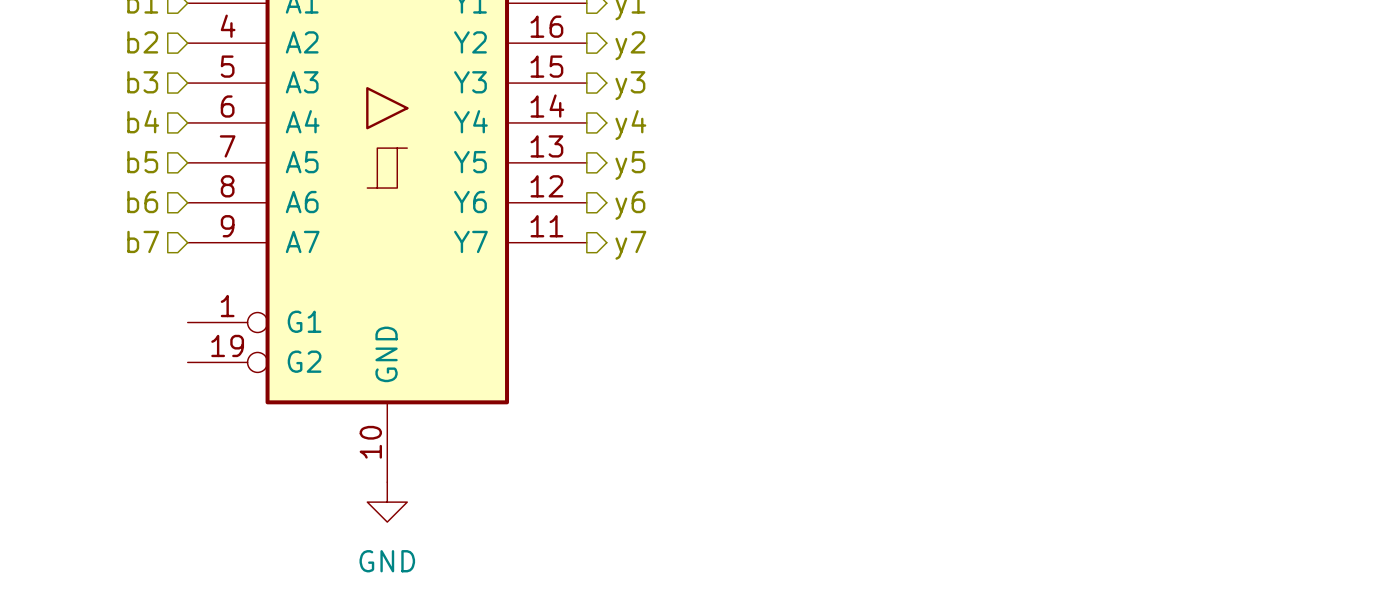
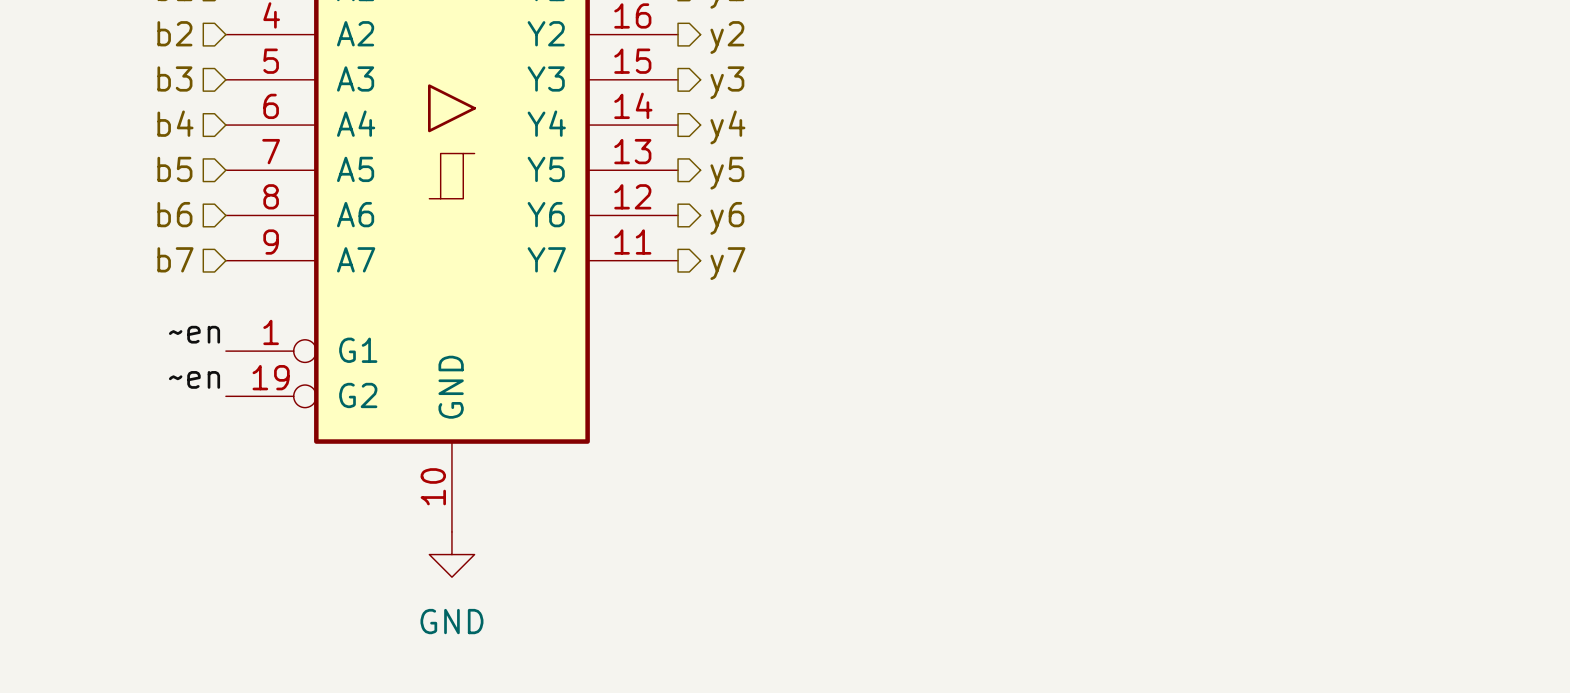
label: none -> ~en (194, 334)
label: none -> ~en (194, 379)

